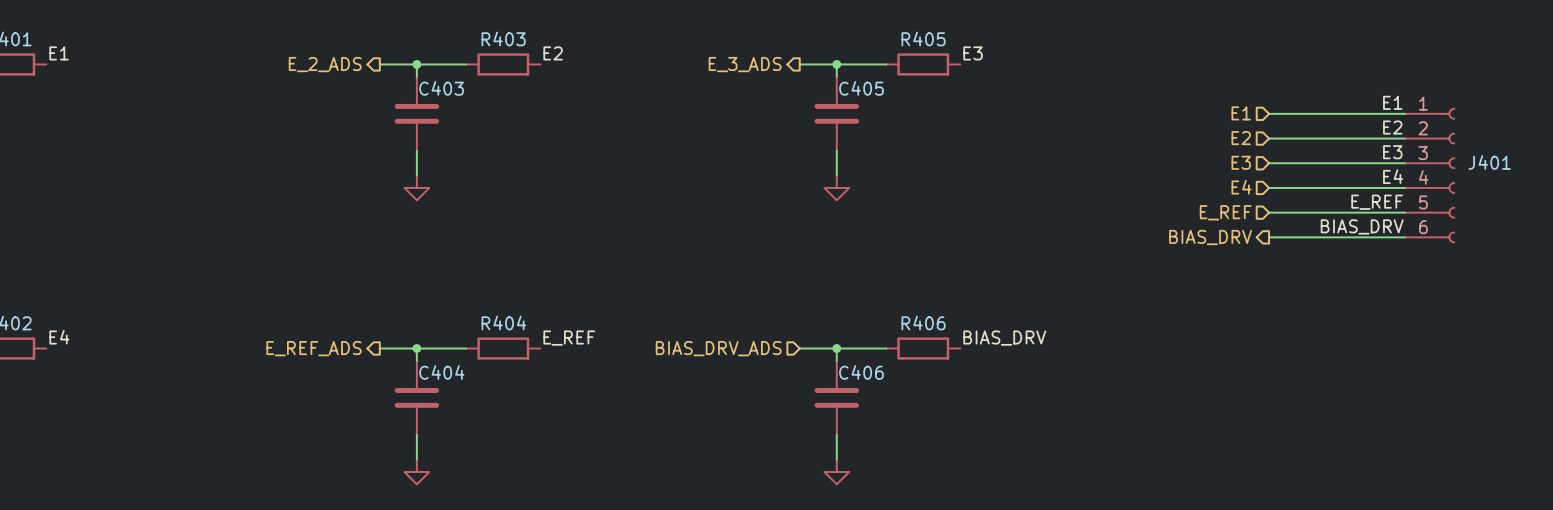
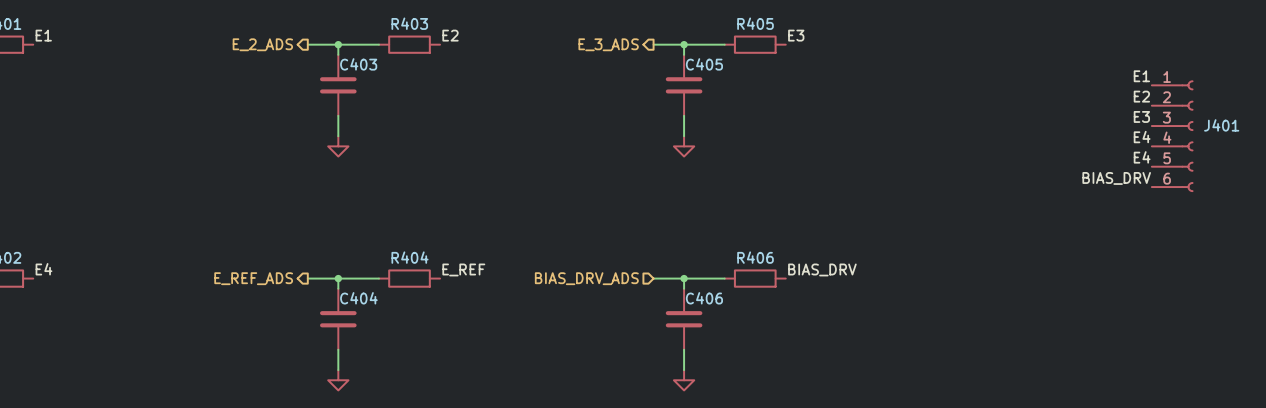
hierarchical label: E1 (1241, 113) -> none
wire: (1269, 113) (1404, 113) -> none
hierarchical label: E2 (1241, 138) -> none
wire: (1269, 138) (1404, 138) -> none
hierarchical label: E3 (1241, 162) -> none
wire: (1269, 163) (1404, 163) -> none
hierarchical label: E4 (1241, 187) -> none
wire: (1269, 187) (1404, 187) -> none
label: E_REF (1377, 202) -> E4 (1142, 157)
hierarchical label: E_REF (1225, 212) -> none
wire: (1269, 212) (1404, 212) -> none
hierarchical label: BIAS_DRV (1210, 237) -> none
wire: (1269, 237) (1404, 237) -> none

